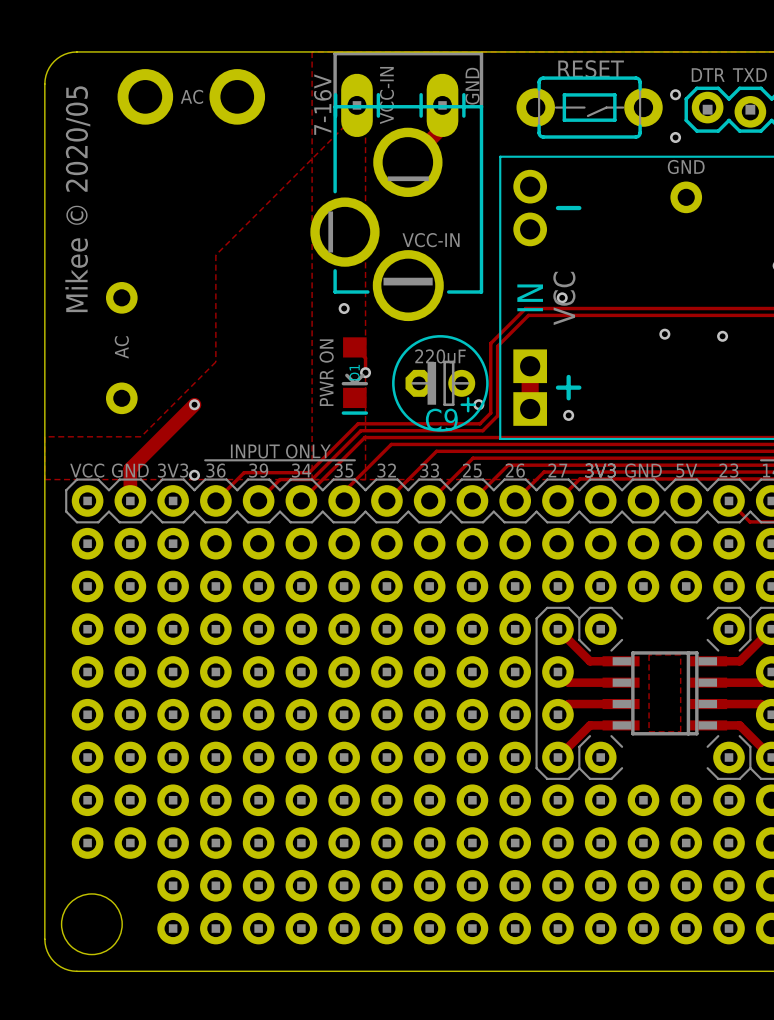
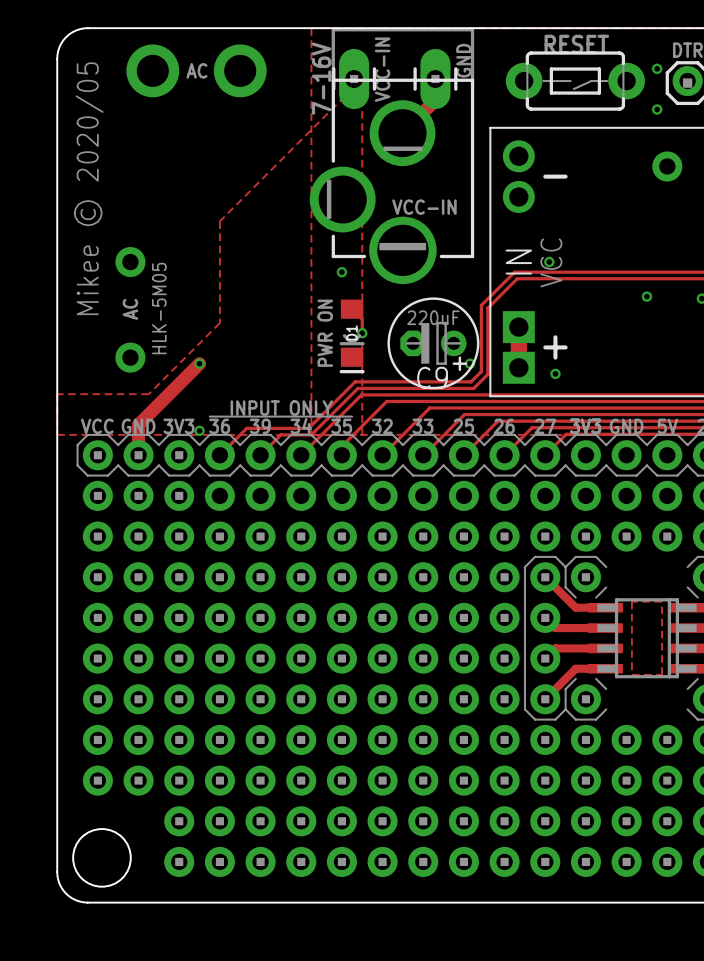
text: GND (686, 167) -> none
text: none -> HLK-5M05 (159, 308)

